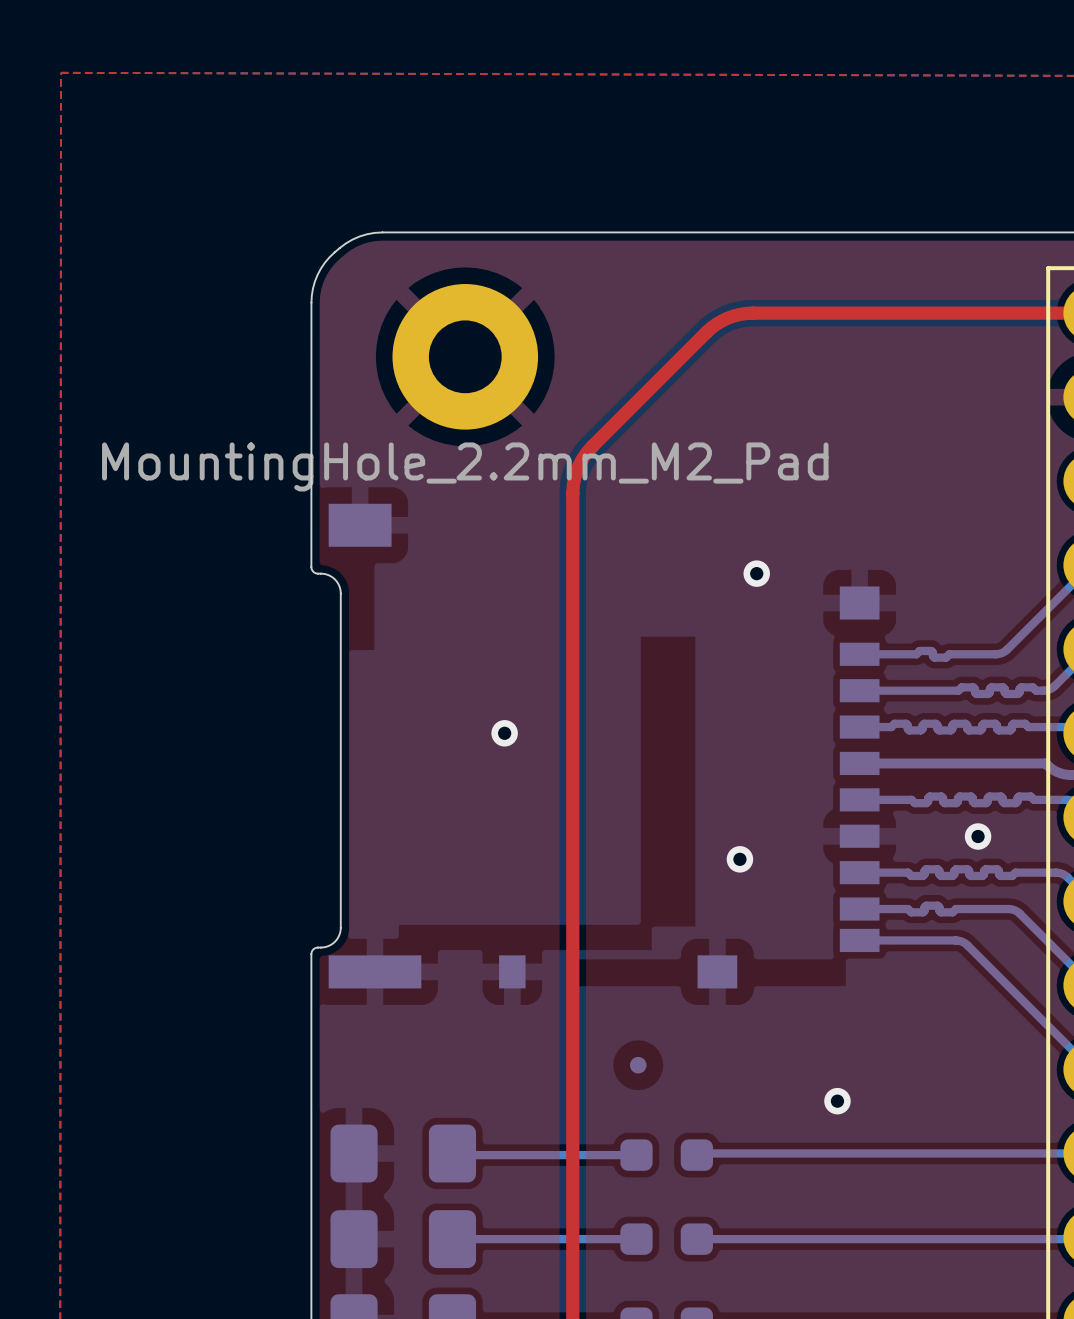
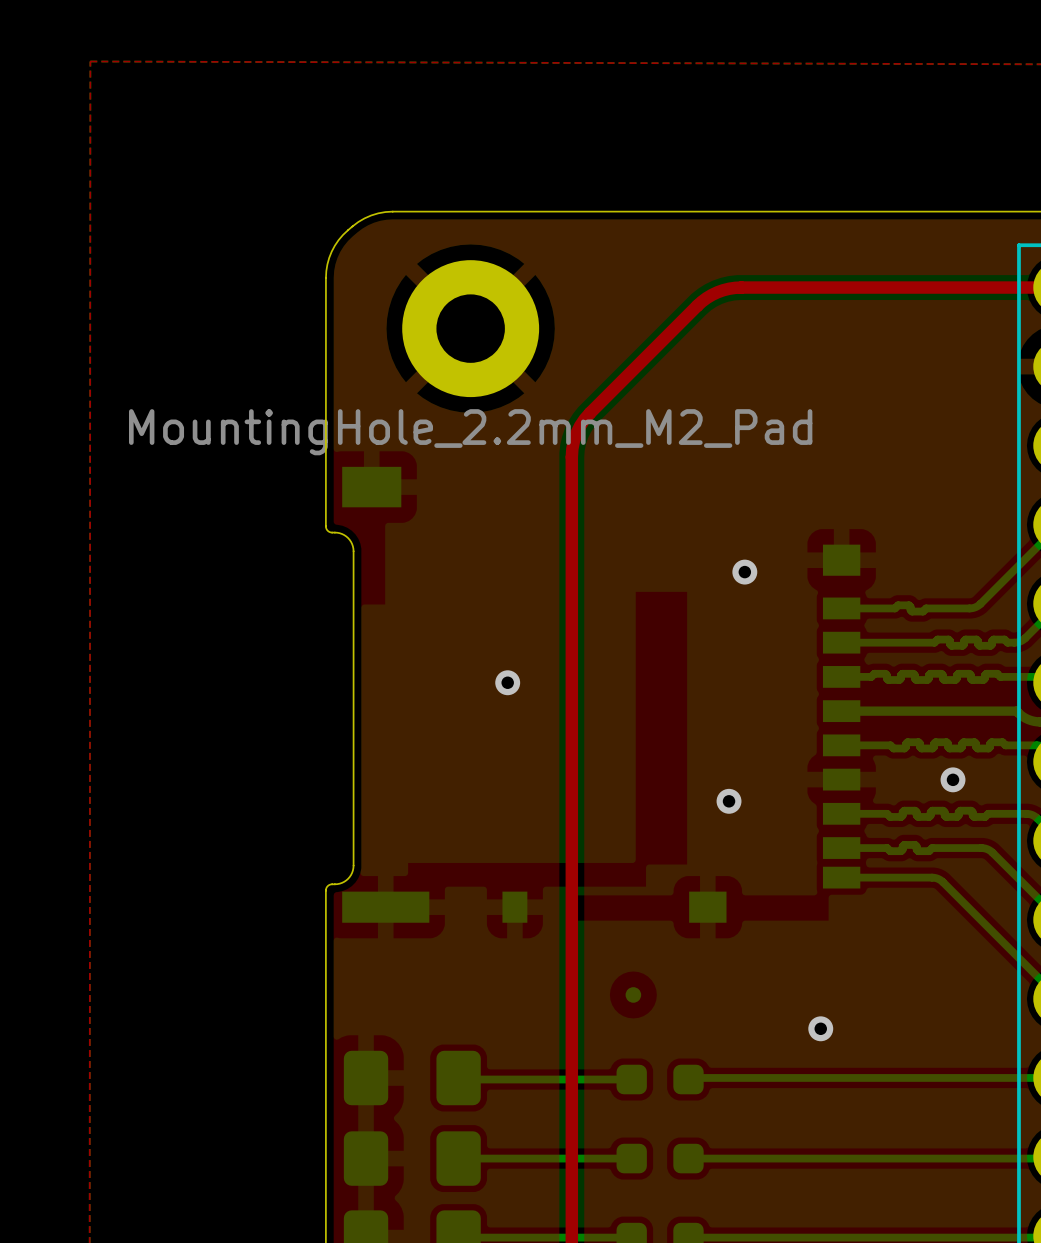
via position: (756, 573) -> (744, 572)

